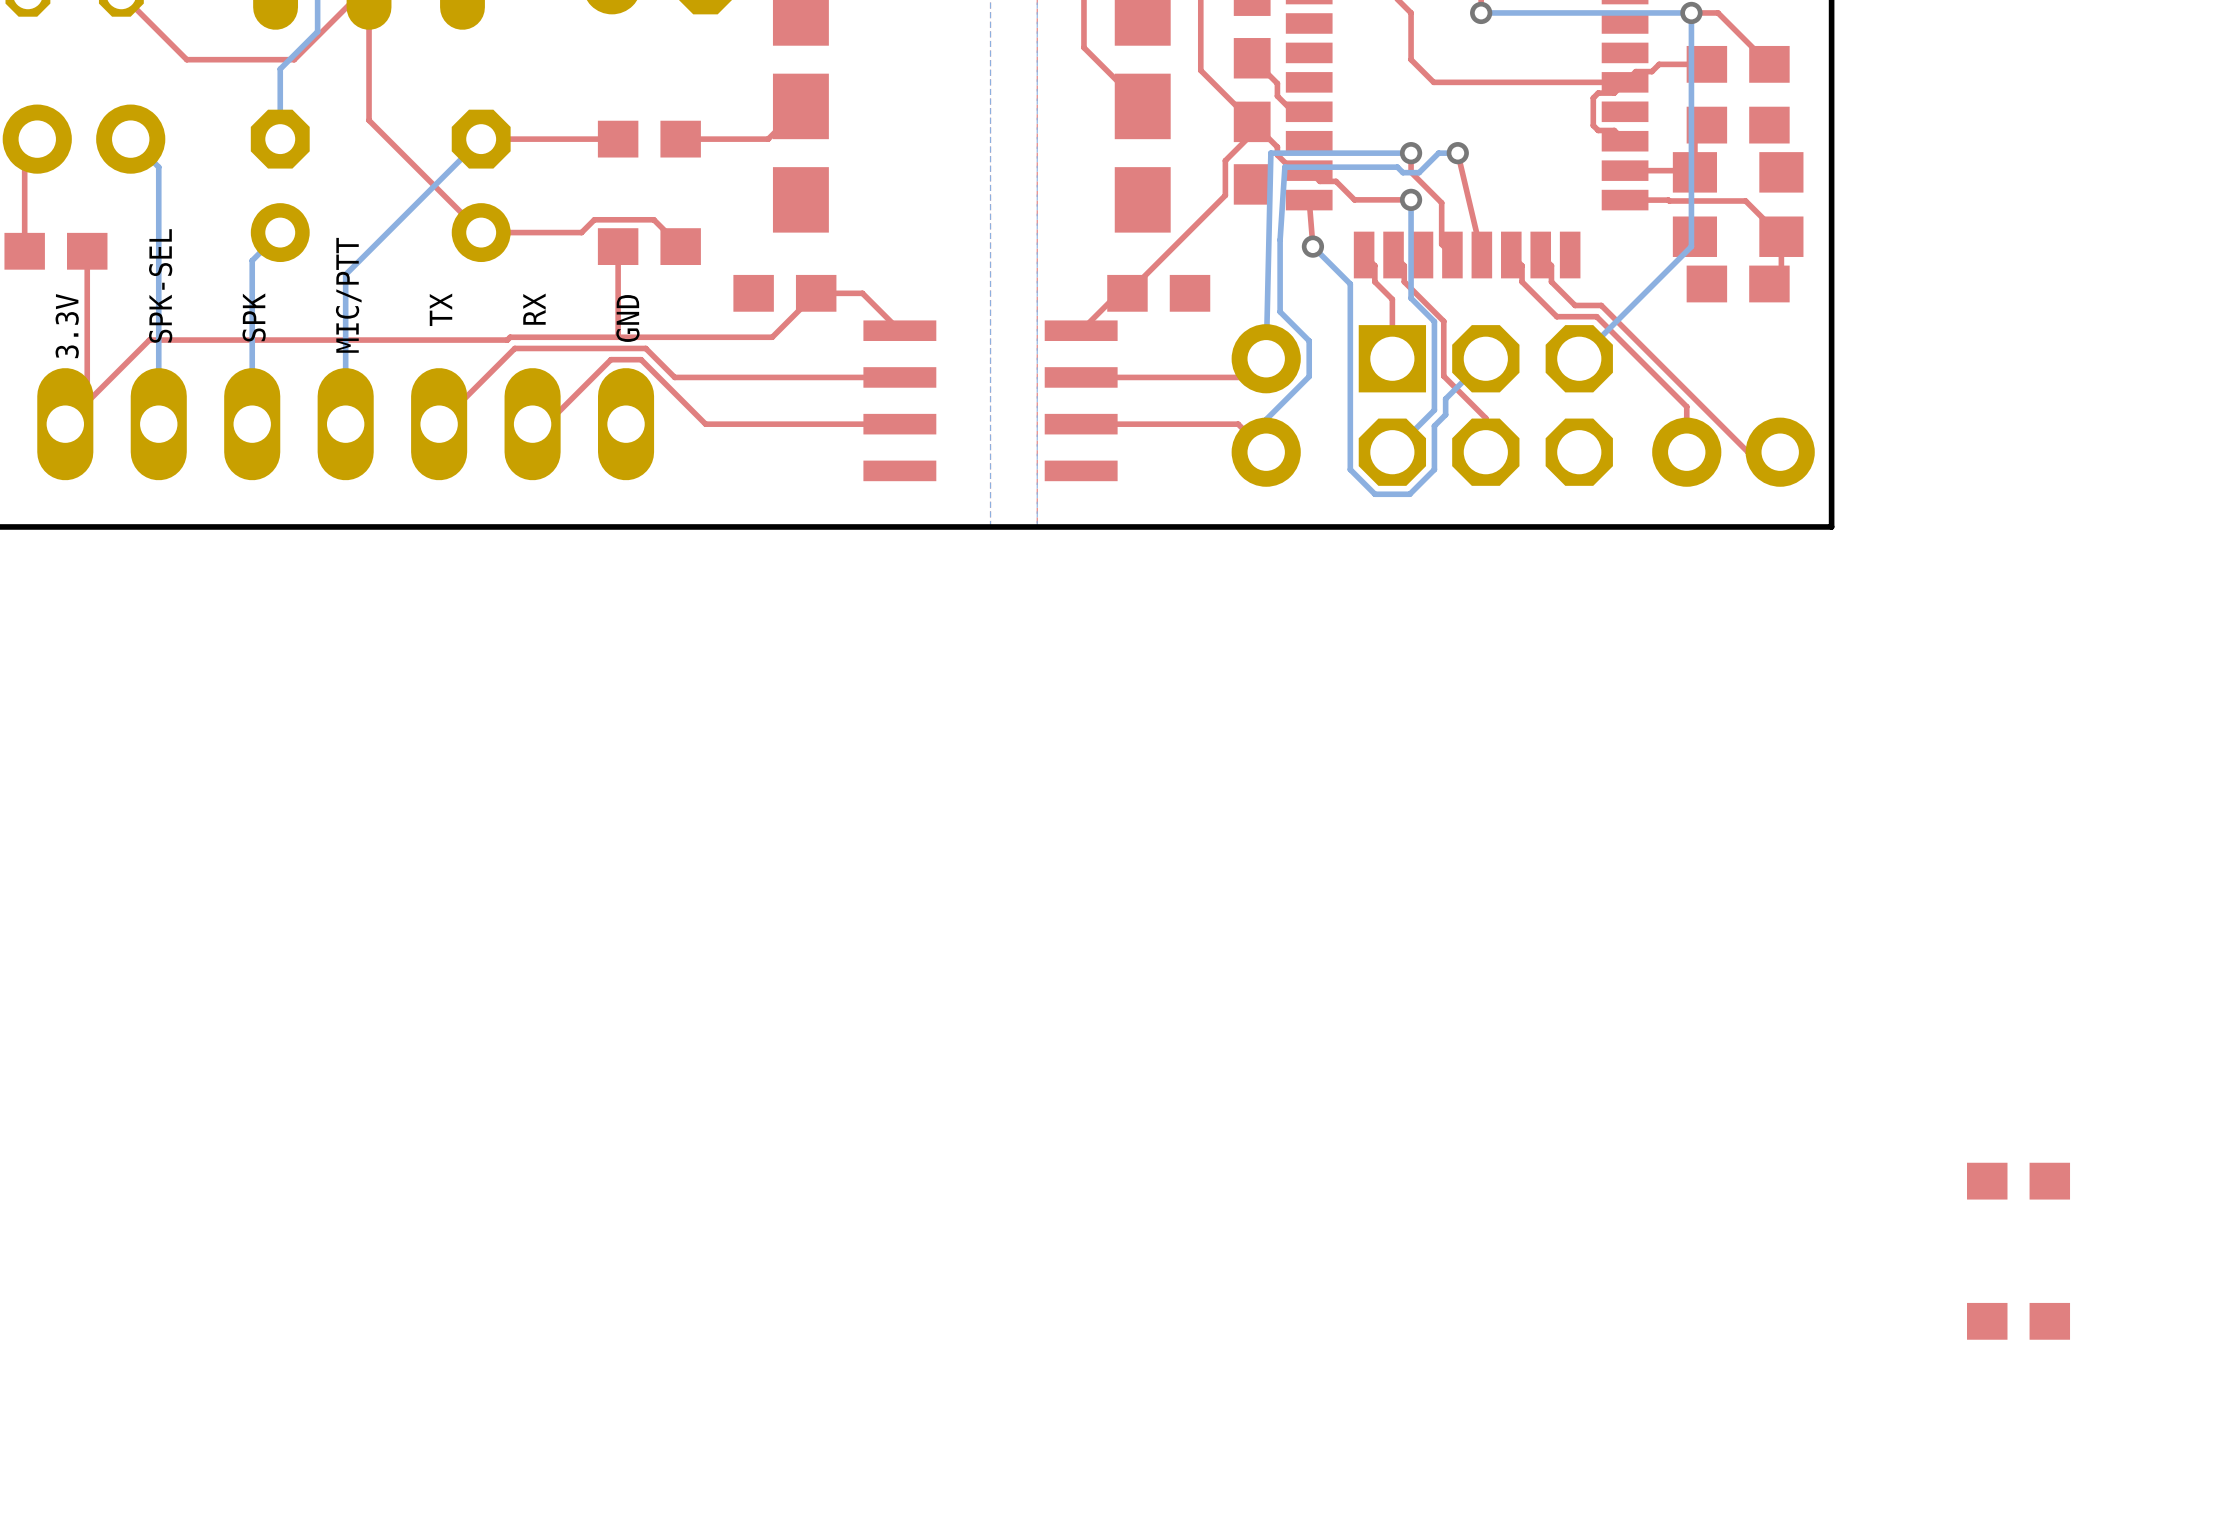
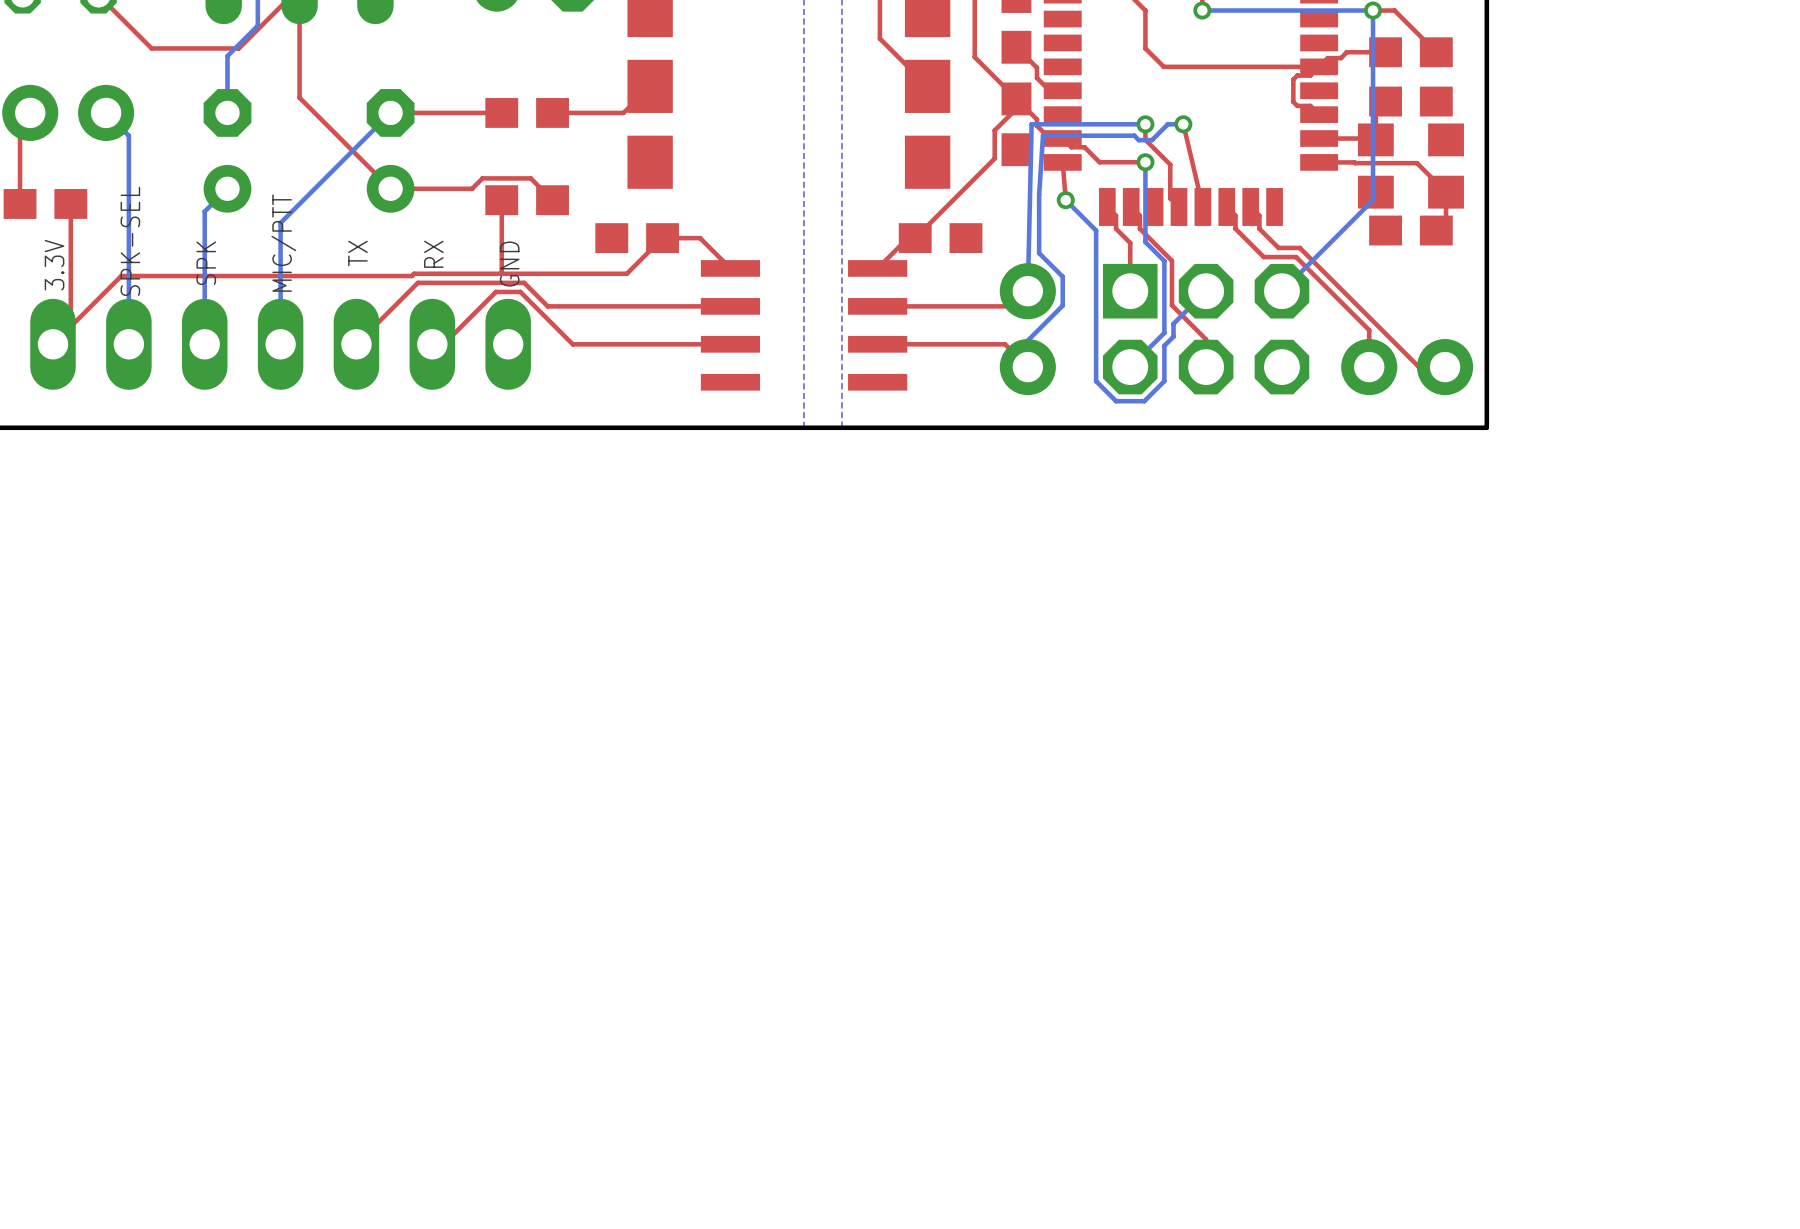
part: (2018, 1181) -> none
part: (2018, 1321) -> none

